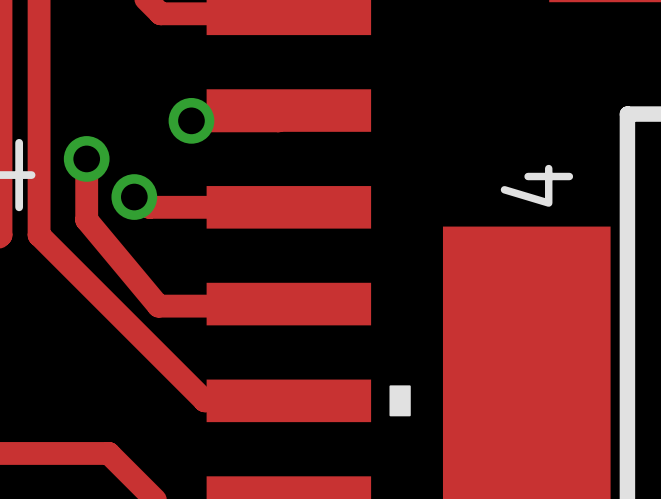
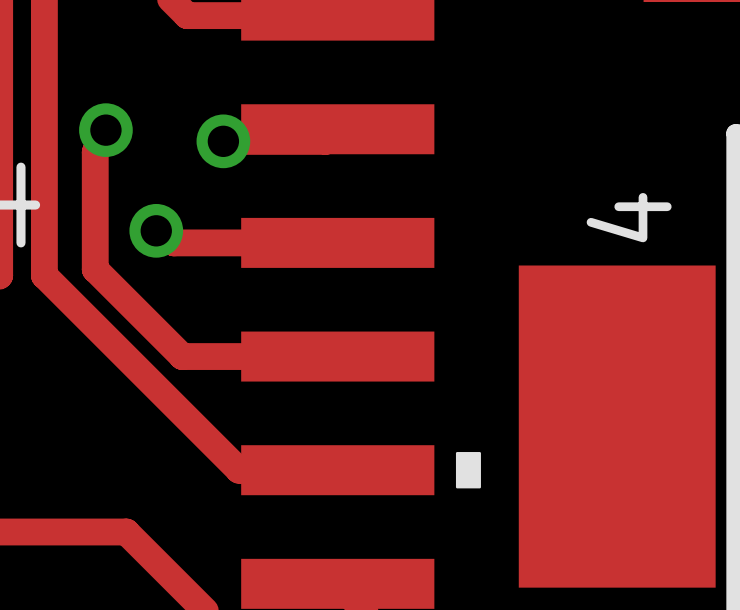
track: (86, 158) (86, 219) (158, 306) (286, 306) (288, 304) -> (105, 130) (95, 152) (95, 269) (182, 356) (337, 356)
via position: (86, 158) -> (105, 130)

